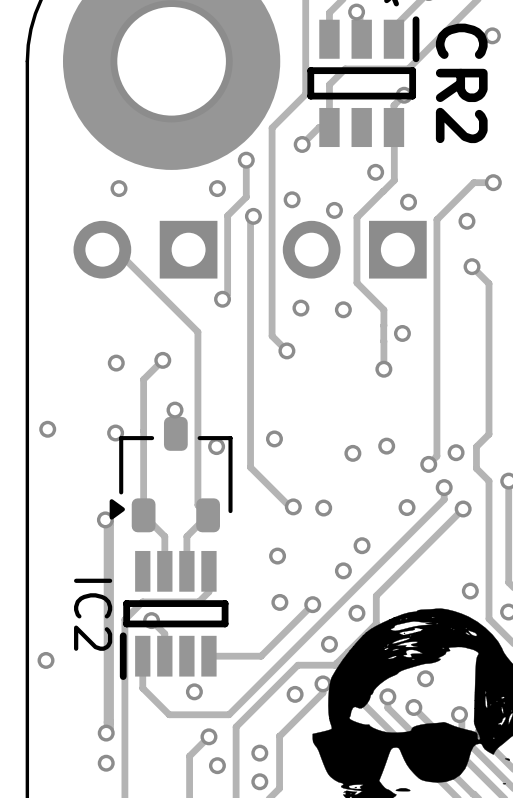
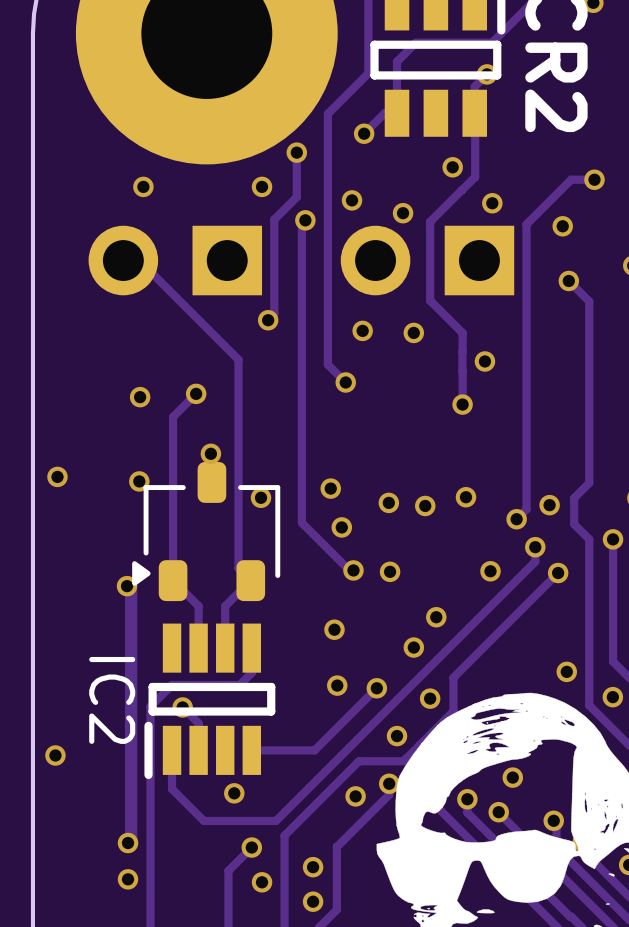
via: none -> (388, 502)
via: none -> (341, 527)

